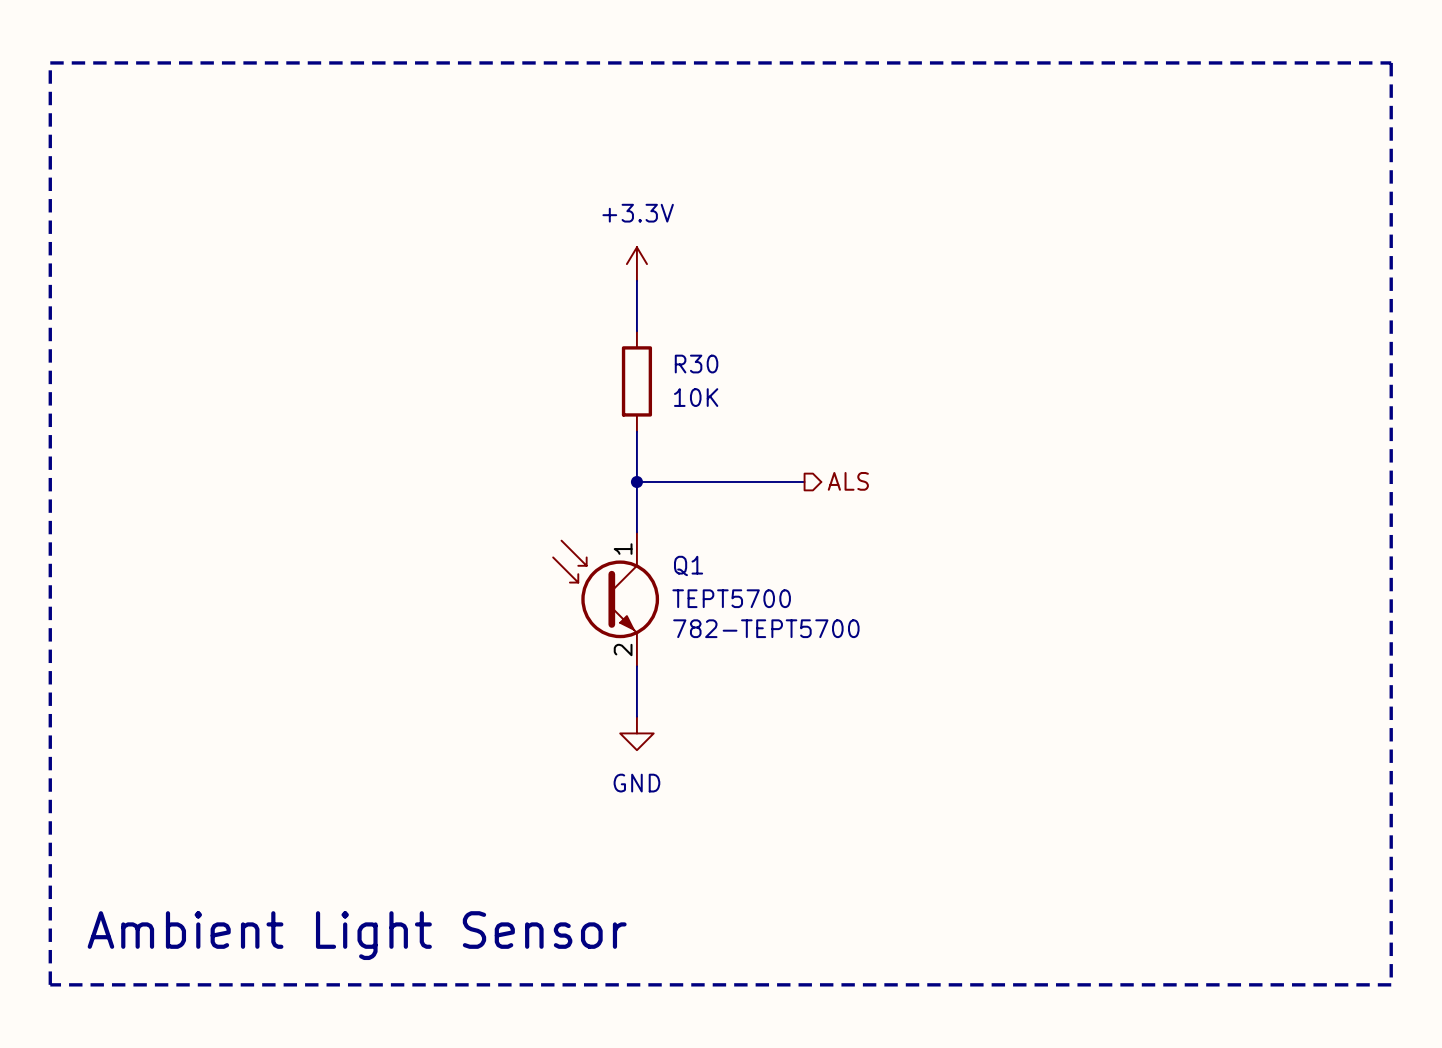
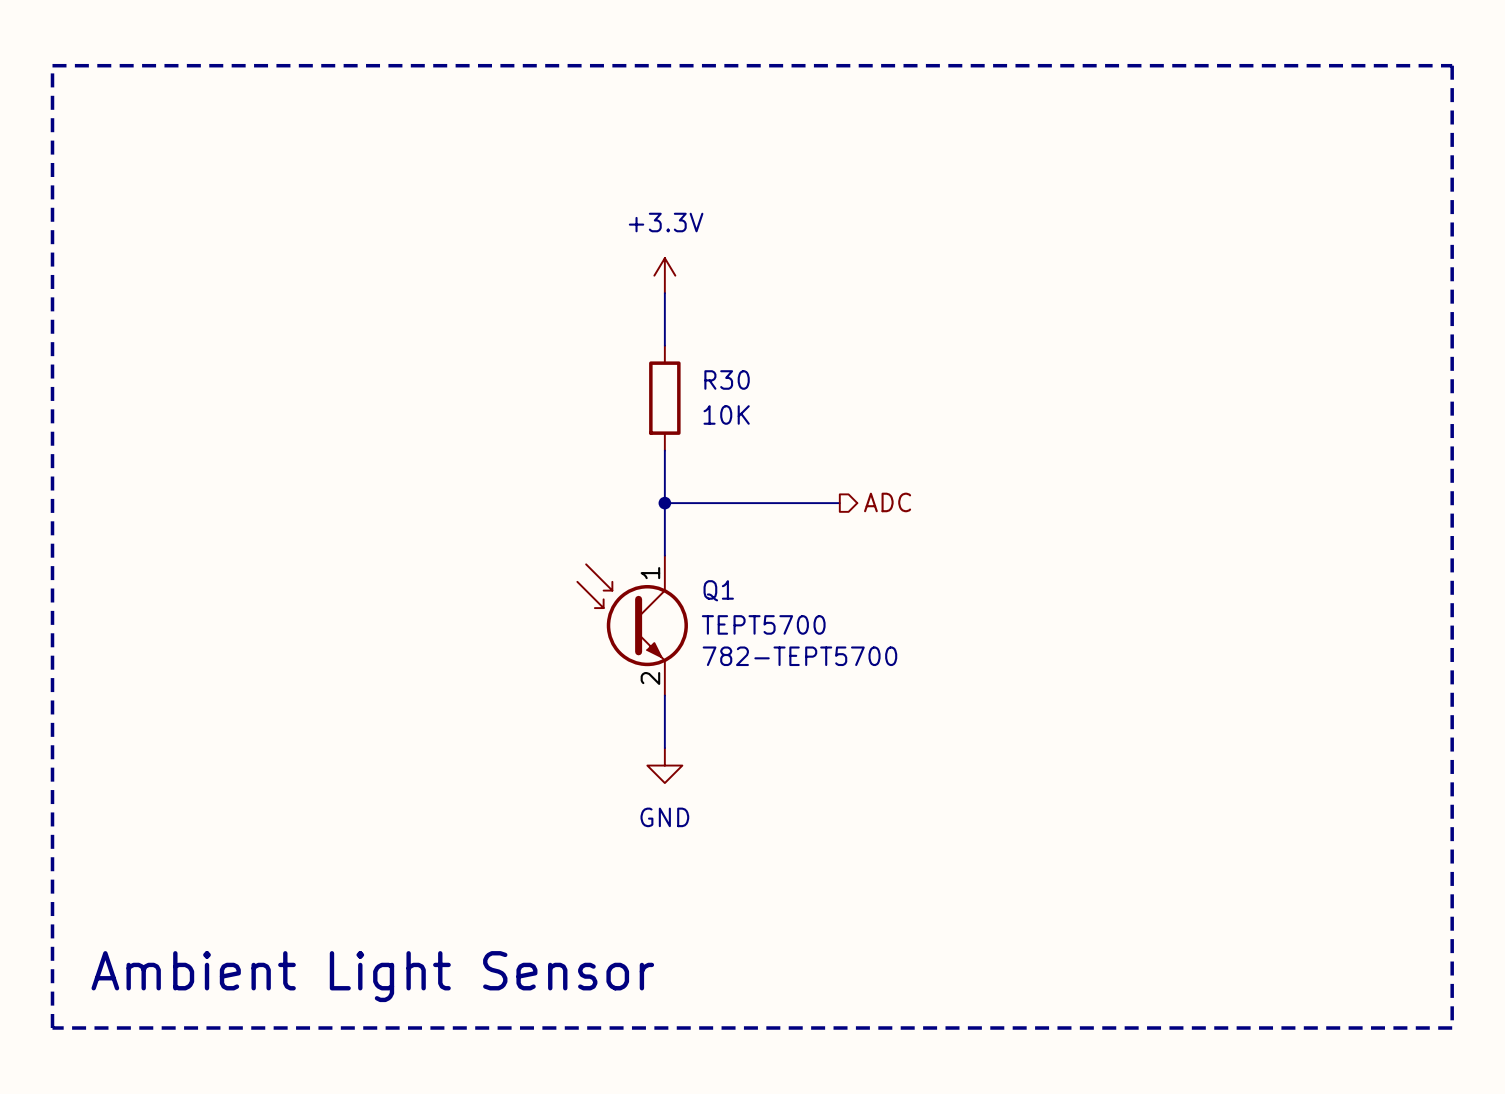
hierarchical label: ALS (848, 481) -> ADC (887, 502)

